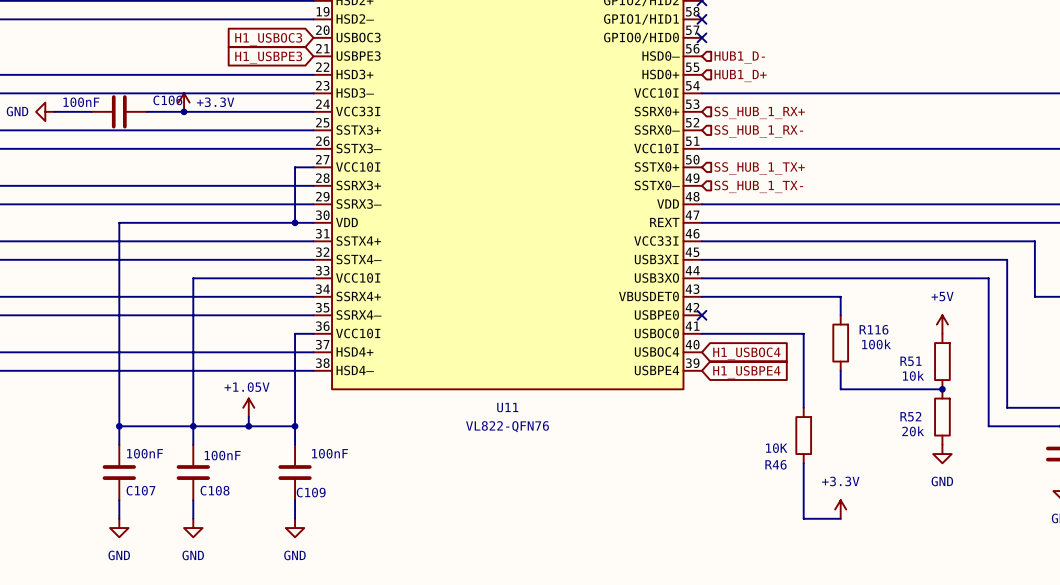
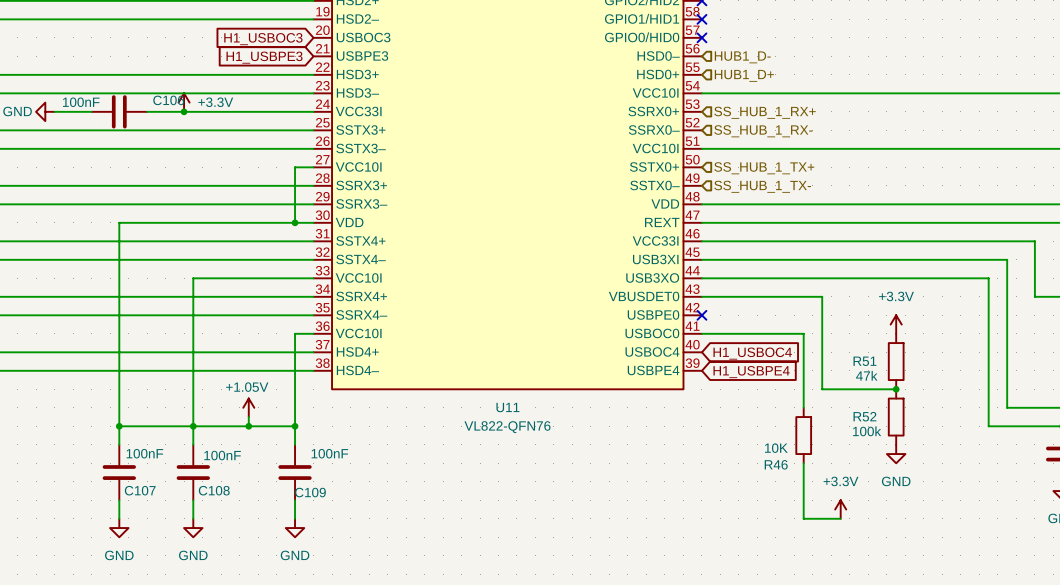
wire: (822, 296) (840, 296) (840, 315) -> (822, 296) (822, 389) (840, 389)
power symbol: none -> +3.3V (896, 324)
power symbol: +5V (942, 324) -> none
R116: 100k (840, 343) -> none
R51 position: (942, 361) -> (896, 361)
wire: (840, 370) (840, 389) -> none
R51 value: 10k (913, 375) -> 47k (866, 375)
wire: (896, 389) (942, 389) -> none
junction: none -> (896, 389)
junction: (942, 389) -> none
R52 position: (942, 417) -> (896, 417)
R52 value: 20k (913, 431) -> 100k (867, 431)
power symbol position: GND (942, 454) -> GND (896, 454)

